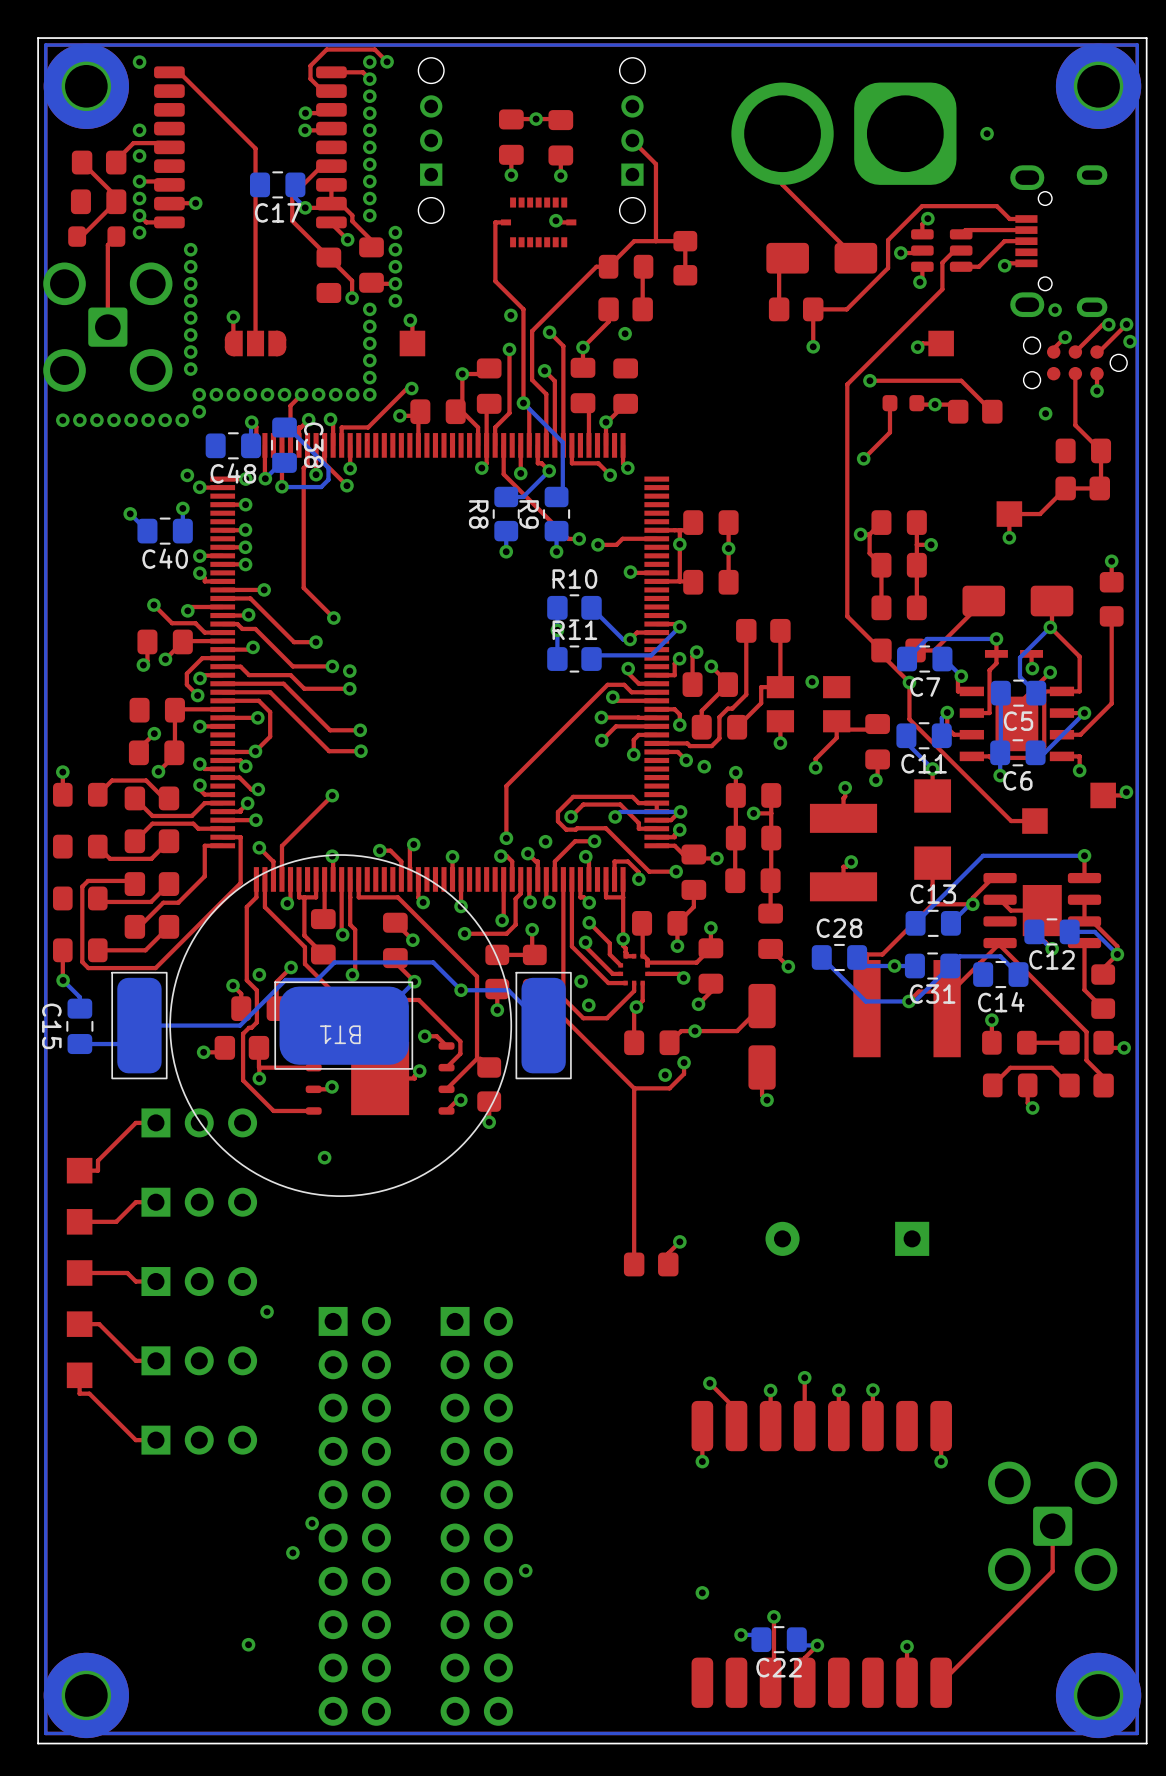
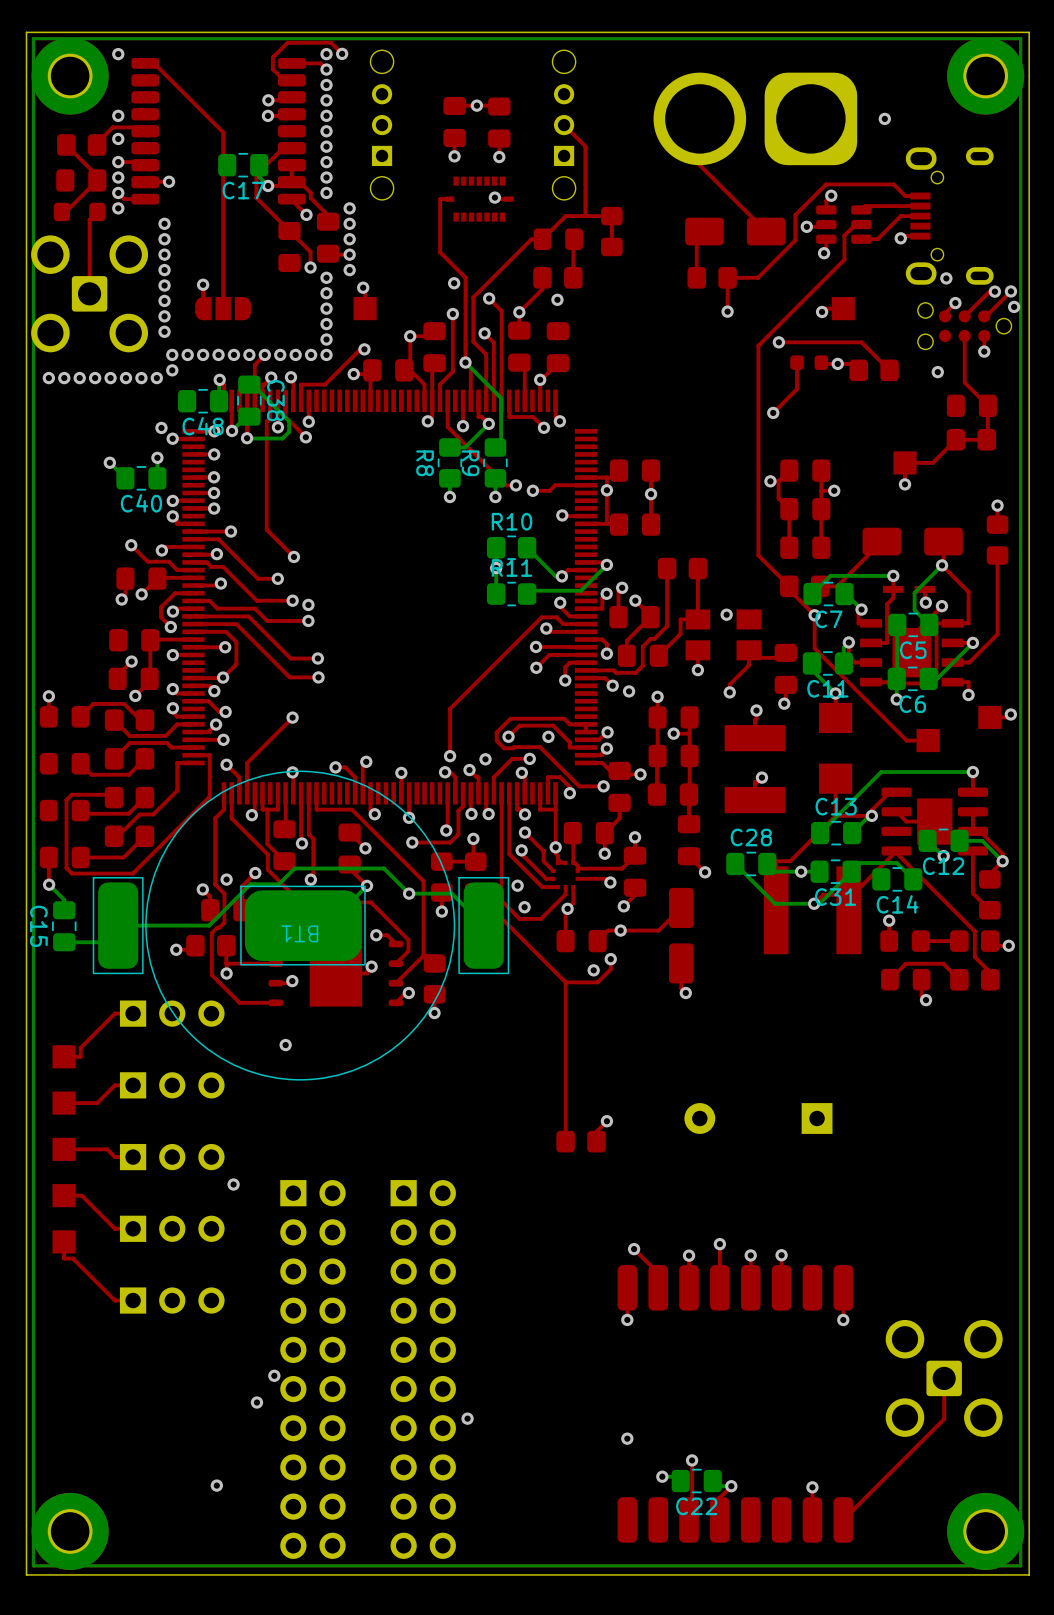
bottom track: (680, 811) (620, 811) (615, 816) -> none

